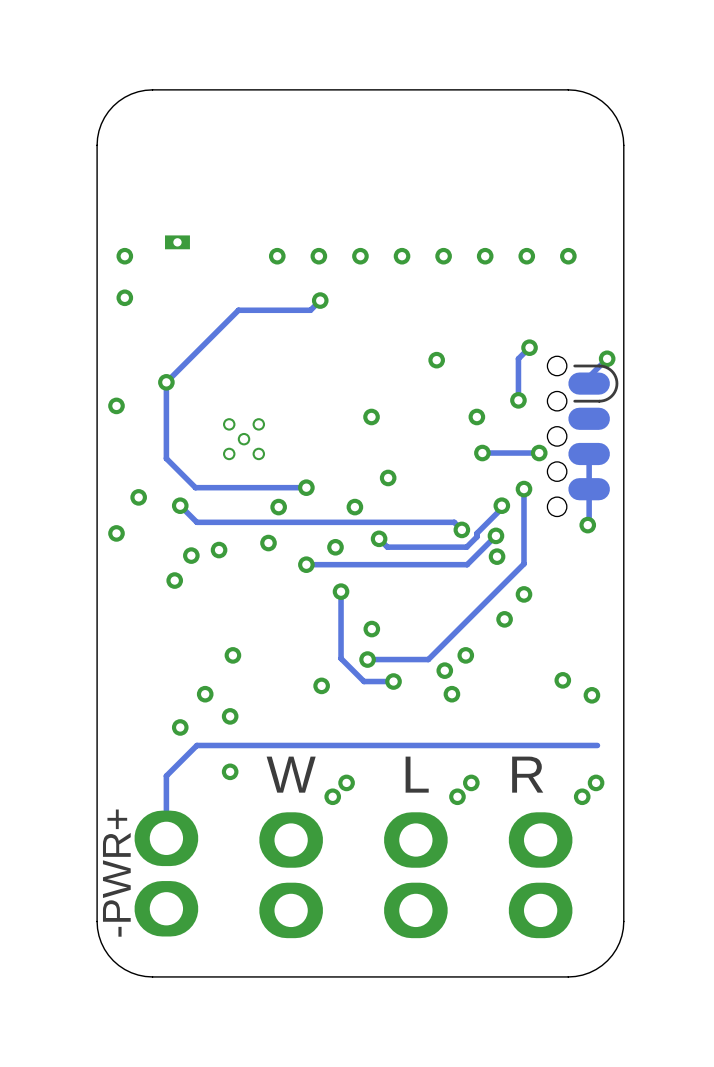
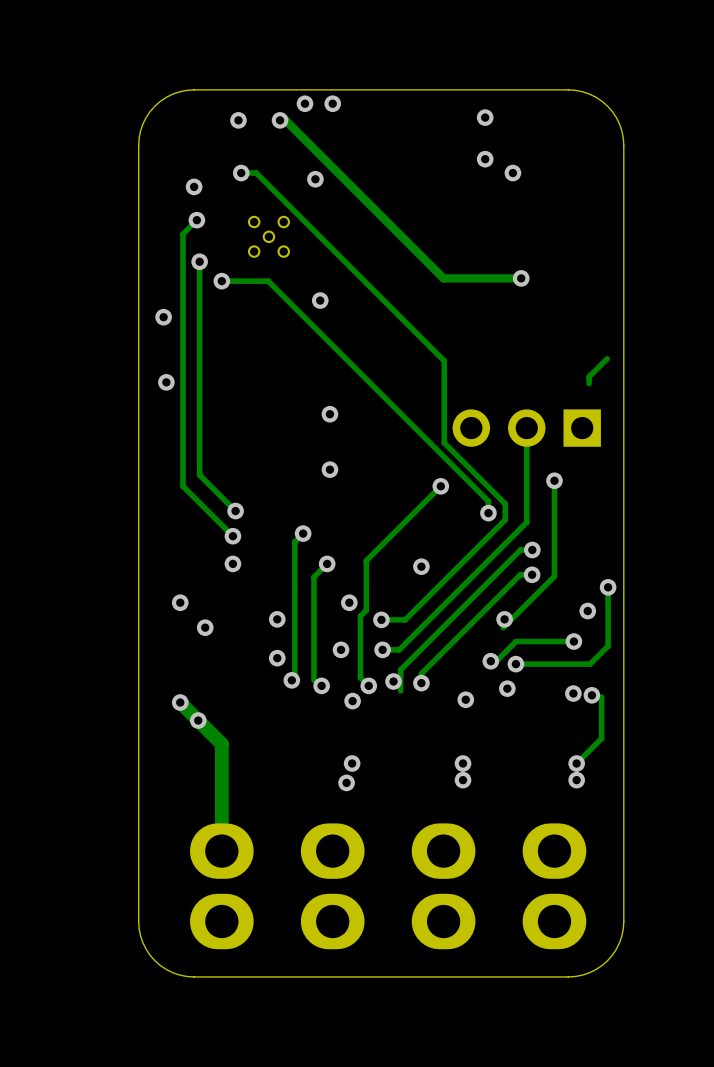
board edge: (194, 89) (145, 90) (124, 97) (113, 106) (104, 117) (98, 130) (97, 145) (97, 928) (104, 949) (113, 960) (124, 969) (145, 976) (194, 976) -> (194, 89) (172, 94) (154, 106) (142, 124) (138, 145) (139, 928) (146, 949) (160, 965) (172, 972) (194, 976)
via: none -> (304, 103)
via: none -> (332, 103)
via: none -> (485, 117)
via: none -> (238, 120)
track: none -> (280, 120) (285, 120) (443, 278) (521, 278)
via: none -> (280, 120)
via: none -> (485, 159)
track: none -> (241, 173) (256, 173) (444, 361) (444, 442) (505, 503) (505, 519) (405, 619) (381, 619)
via: none -> (241, 173)
via: none -> (512, 173)
via: none -> (315, 179)
via: none -> (194, 186)
track: none -> (196, 220) (183, 234) (183, 486) (232, 536)
via: none -> (196, 220)
part: (177, 242) -> none
via: (124, 256) -> none
via: (277, 256) -> none
via: (318, 256) -> none
via: (360, 256) -> none
via: (402, 256) -> none
via: (443, 256) -> none
via: (485, 256) -> none
via: (526, 256) -> none
via: (568, 256) -> none
track: none -> (199, 261) (199, 475) (235, 511)
via: none -> (199, 261)
via: none -> (521, 278)
track: none -> (221, 281) (268, 281) (488, 501) (488, 513)
via: none -> (221, 281)
via: (124, 297) -> none
track: (320, 300) (310, 310) (238, 310) (166, 382) (166, 458) (195, 487) (306, 487) -> none
via: none -> (163, 317)
track: (529, 347) (518, 358) (518, 400) -> none
via: (529, 347) -> none
via: (607, 358) -> none
via: (436, 360) -> none
via: (518, 400) -> none
via: (116, 405) -> none
via: none -> (329, 414)
via: (371, 416) -> none
via: (476, 416) -> none
track: none -> (526, 428) (526, 522) (399, 649) (382, 649)
part: none -> (526, 428)
part: (582, 436) -> none
part position: (244, 439) -> (268, 236)
via: (482, 453) -> none
track: (539, 453) (482, 453) -> none
via: (539, 453) -> none
track: (589, 454) (587, 525) -> none
via: none -> (329, 469)
via: (388, 477) -> none
track: none -> (554, 480) (554, 576) (503, 627)
via: none -> (554, 480)
track: none -> (440, 486) (366, 560) (366, 610) (360, 616) (360, 677) (368, 685)
via: none -> (440, 486)
via: (306, 487) -> none
track: (523, 489) (523, 563) (428, 659) (367, 659) -> none
via: (523, 489) -> none
via: (138, 497) -> none
track: (180, 505) (196, 522) (454, 522) (461, 529) -> none
via: (180, 505) -> none
track: (501, 505) (501, 508) (476, 533) (476, 536) (466, 547) (387, 547) (379, 538) -> none
via position: (501, 505) -> (488, 513)
via: (278, 507) -> none
via: (354, 507) -> none
via: none -> (235, 511)
via: (587, 525) -> none
via: (461, 529) -> none
via: (116, 533) -> none
track: none -> (303, 533) (294, 541) (294, 677) (291, 680)
via: none -> (303, 533)
track: (495, 535) (467, 564) (306, 564) -> none
via: (495, 535) -> none
via: none -> (232, 536)
via: (379, 538) -> none
via: (268, 543) -> none
via position: (335, 547) -> (327, 563)
track: none -> (532, 549) (520, 549) (400, 669) (400, 690)
via: none -> (532, 549)
via: (219, 550) -> none
via: (191, 555) -> none
via: (497, 556) -> none
via: none -> (232, 563)
track: none -> (327, 563) (314, 577) (314, 680)
via: (306, 564) -> none
via: none -> (421, 566)
track: none -> (532, 574) (520, 574) (421, 673) (421, 683)
via: none -> (532, 574)
via position: (174, 580) -> (180, 602)
track: none -> (608, 587) (608, 646) (590, 664) (515, 664)
via: none -> (608, 587)
track: (341, 591) (341, 658) (364, 681) (393, 681) -> none
via position: (341, 591) -> (349, 602)
via: (523, 594) -> none
via: none -> (587, 611)
via: none -> (277, 619)
via: none -> (205, 627)
via position: (371, 629) -> (381, 619)
track: none -> (573, 641) (516, 641) (496, 661) (490, 661)
via: none -> (573, 641)
via: none -> (341, 649)
via: (232, 655) -> none
via: (465, 655) -> none
via: none -> (277, 658)
via position: (367, 659) -> (382, 649)
via: none -> (490, 661)
via: none -> (515, 664)
via: (444, 670) -> none
via: none -> (291, 680)
via position: (562, 680) -> (573, 693)
via: none -> (421, 683)
via: none -> (368, 685)
via: none -> (507, 688)
via: (205, 694) -> none
via position: (451, 694) -> (465, 699)
track: none -> (601, 696) (601, 738) (576, 763)
via: none -> (352, 701)
track: none -> (180, 702) (221, 744) (221, 851)
via: none -> (180, 702)
via: (230, 716) -> none
via: none -> (198, 720)
via: (180, 727) -> none
track: (597, 745) (196, 745) (166, 775) (166, 838) -> none
via: none -> (463, 763)
via: none -> (576, 763)
via: (230, 771) -> none
text: W (291, 774) -> none
text: L (417, 774) -> none
text: R (527, 774) -> none
via: none -> (463, 780)
via: (471, 782) -> none
via: (596, 782) -> none
via position: (332, 796) -> (352, 763)
via: (457, 796) -> none
via position: (582, 796) -> (576, 780)
text: -PWR+ (116, 873) -> none
part: (166, 873) -> none
part: (291, 875) -> none
part position: (415, 875) -> (443, 886)
part position: (540, 875) -> (554, 886)
part: none -> (221, 886)
part: none -> (332, 886)

